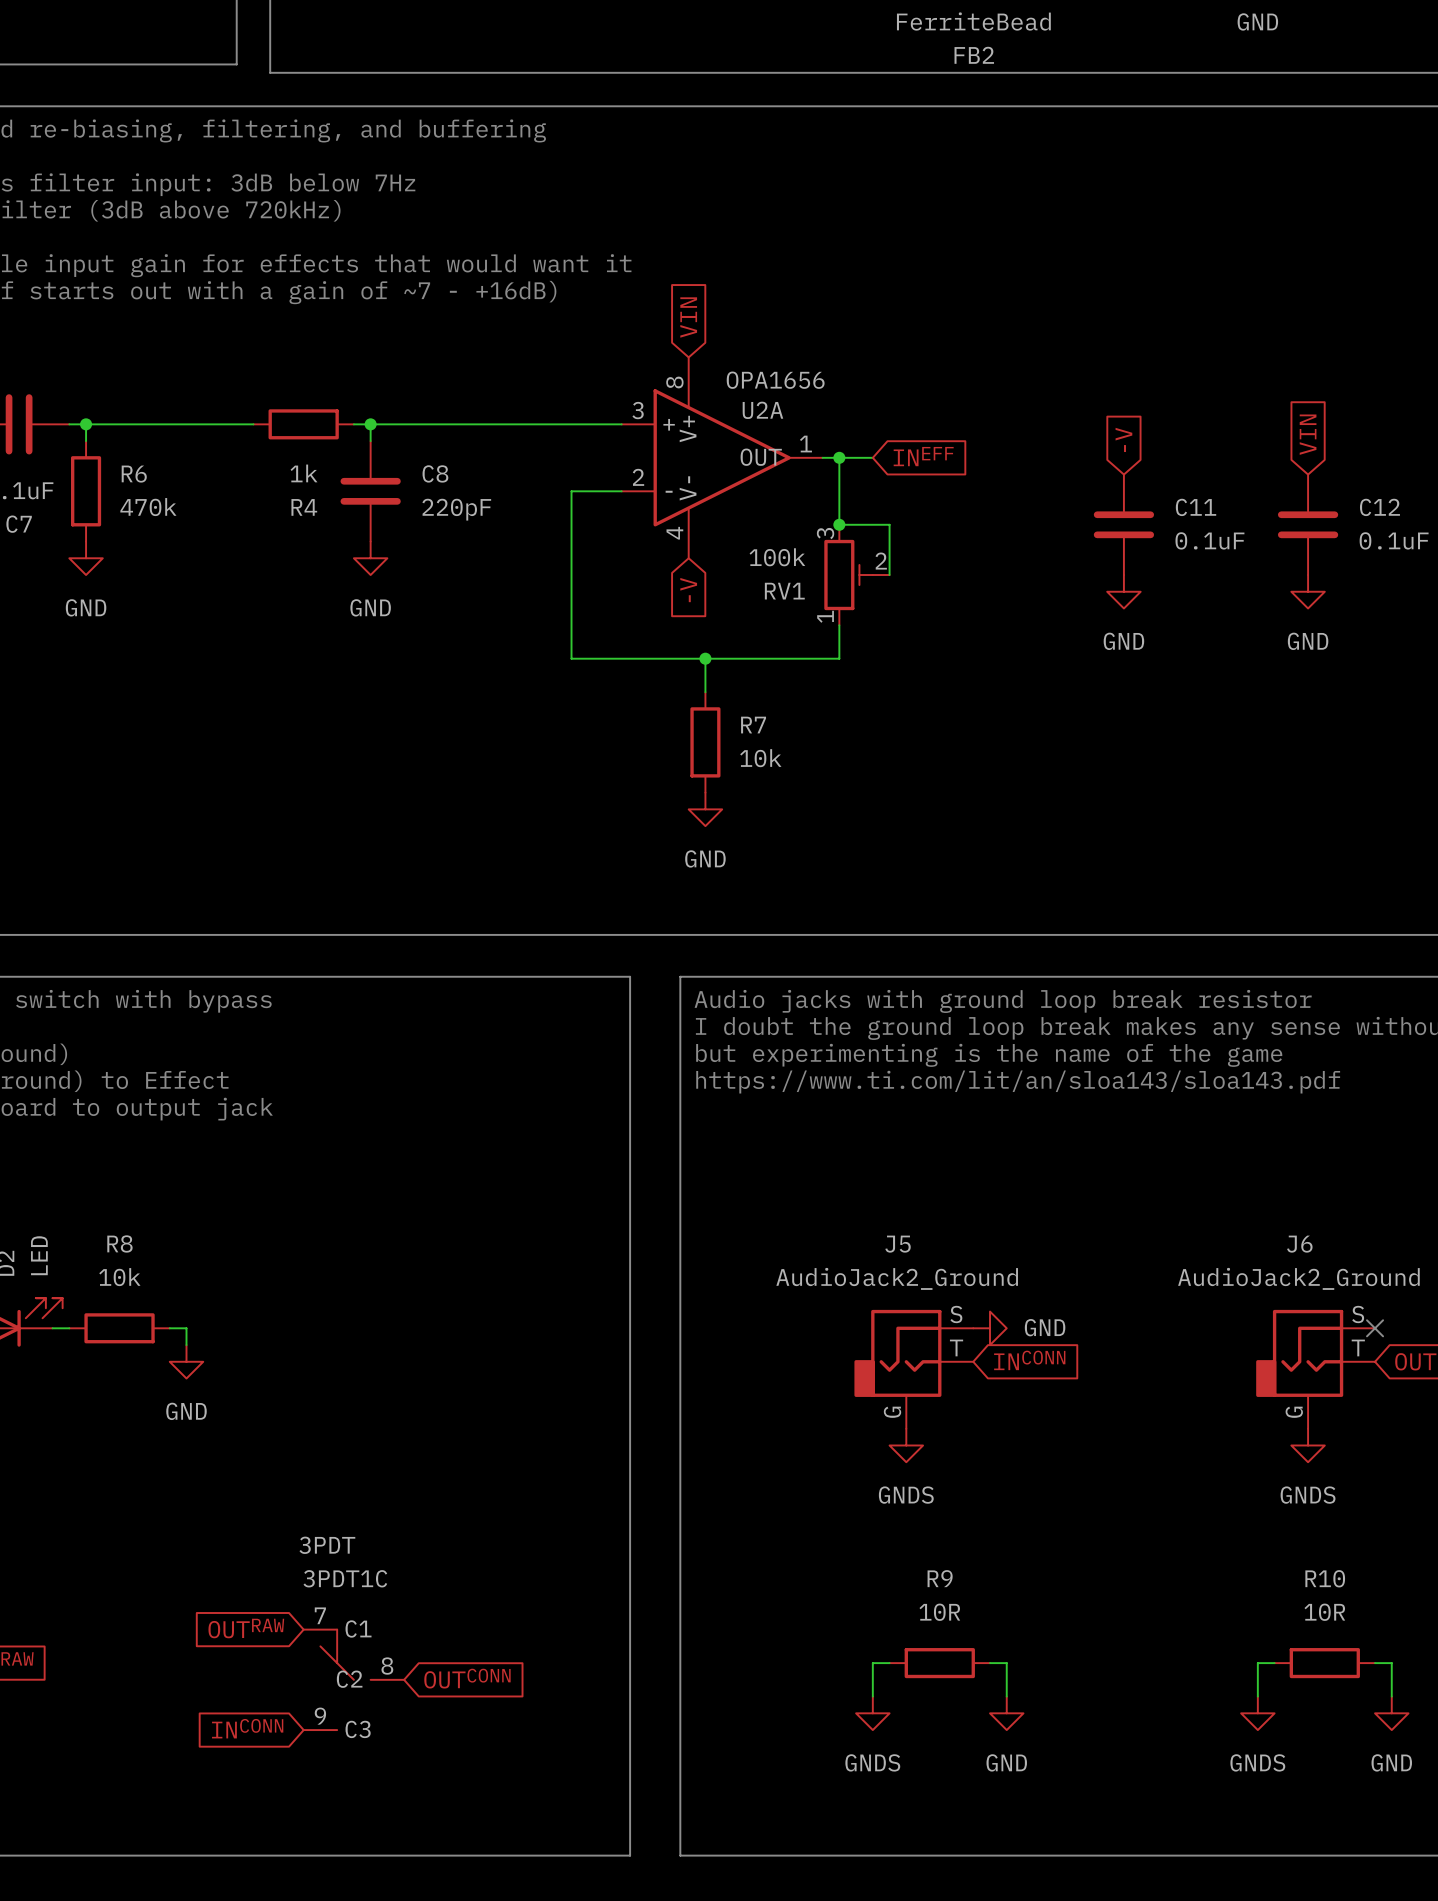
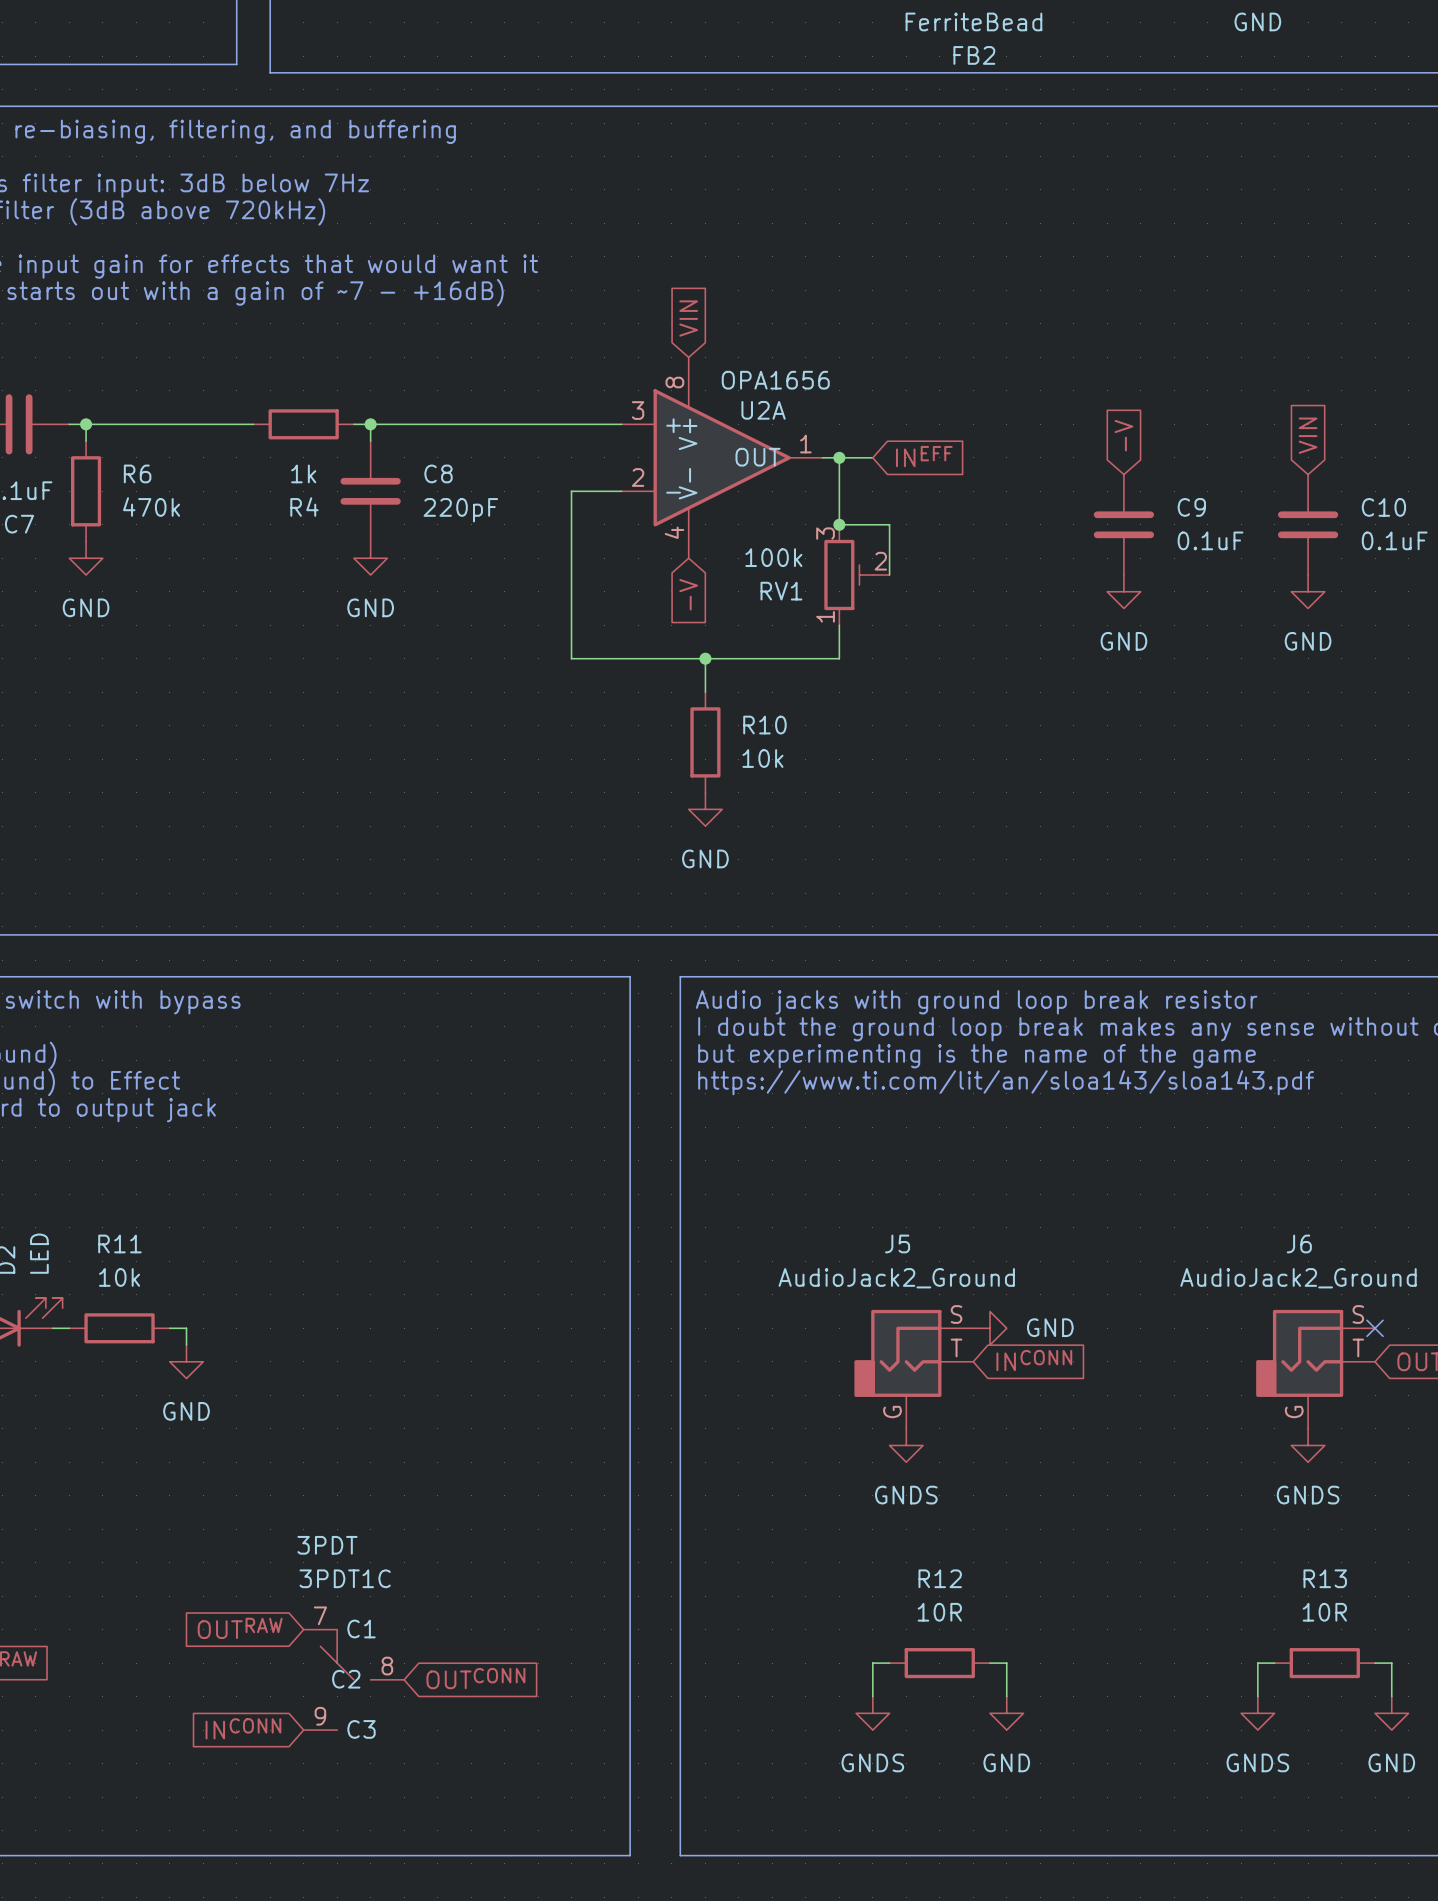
C11 name: C11 (1196, 507) -> C9 (1191, 507)
C12 name: C12 (1379, 507) -> C10 (1383, 507)
R7 name: R7 (753, 725) -> R10 (764, 725)
R8 name: R8 (119, 1243) -> R11 (119, 1243)
R9 name: R9 (940, 1578) -> R12 (940, 1578)
R10 name: R10 (1325, 1578) -> R13 (1325, 1578)

